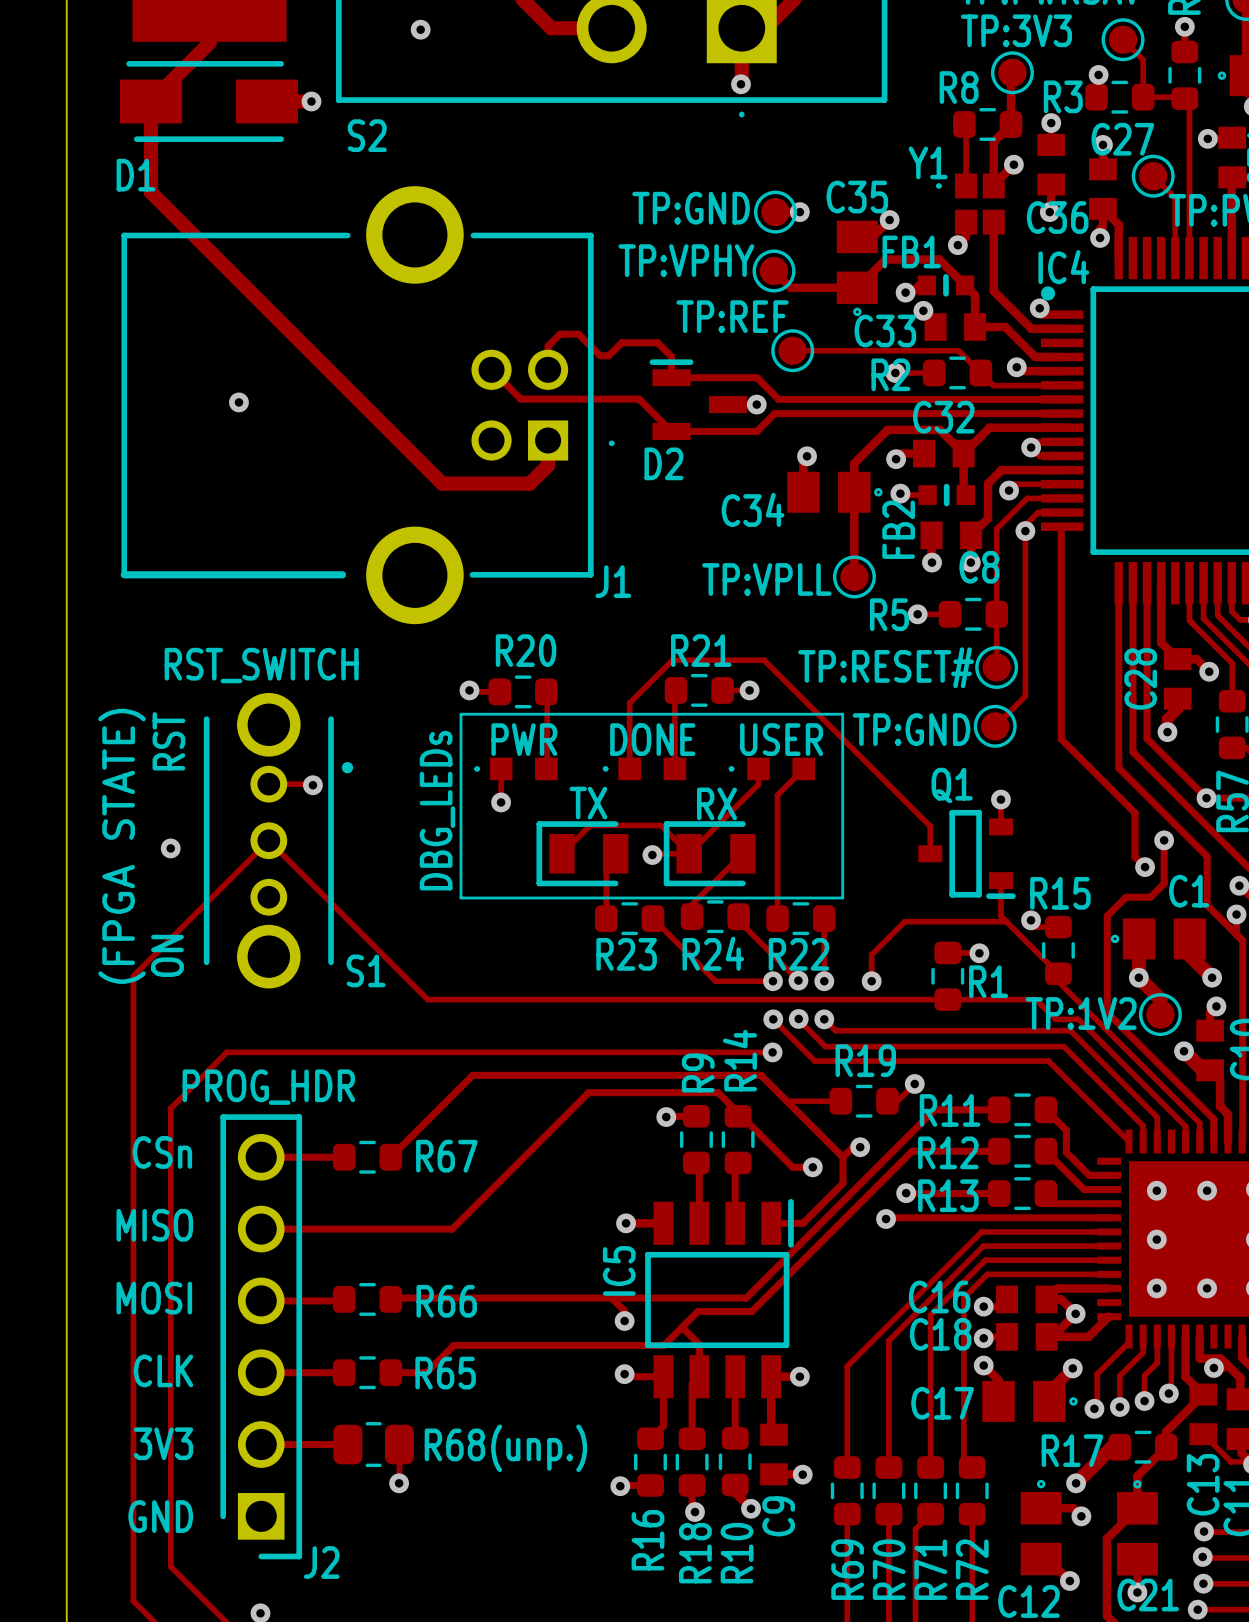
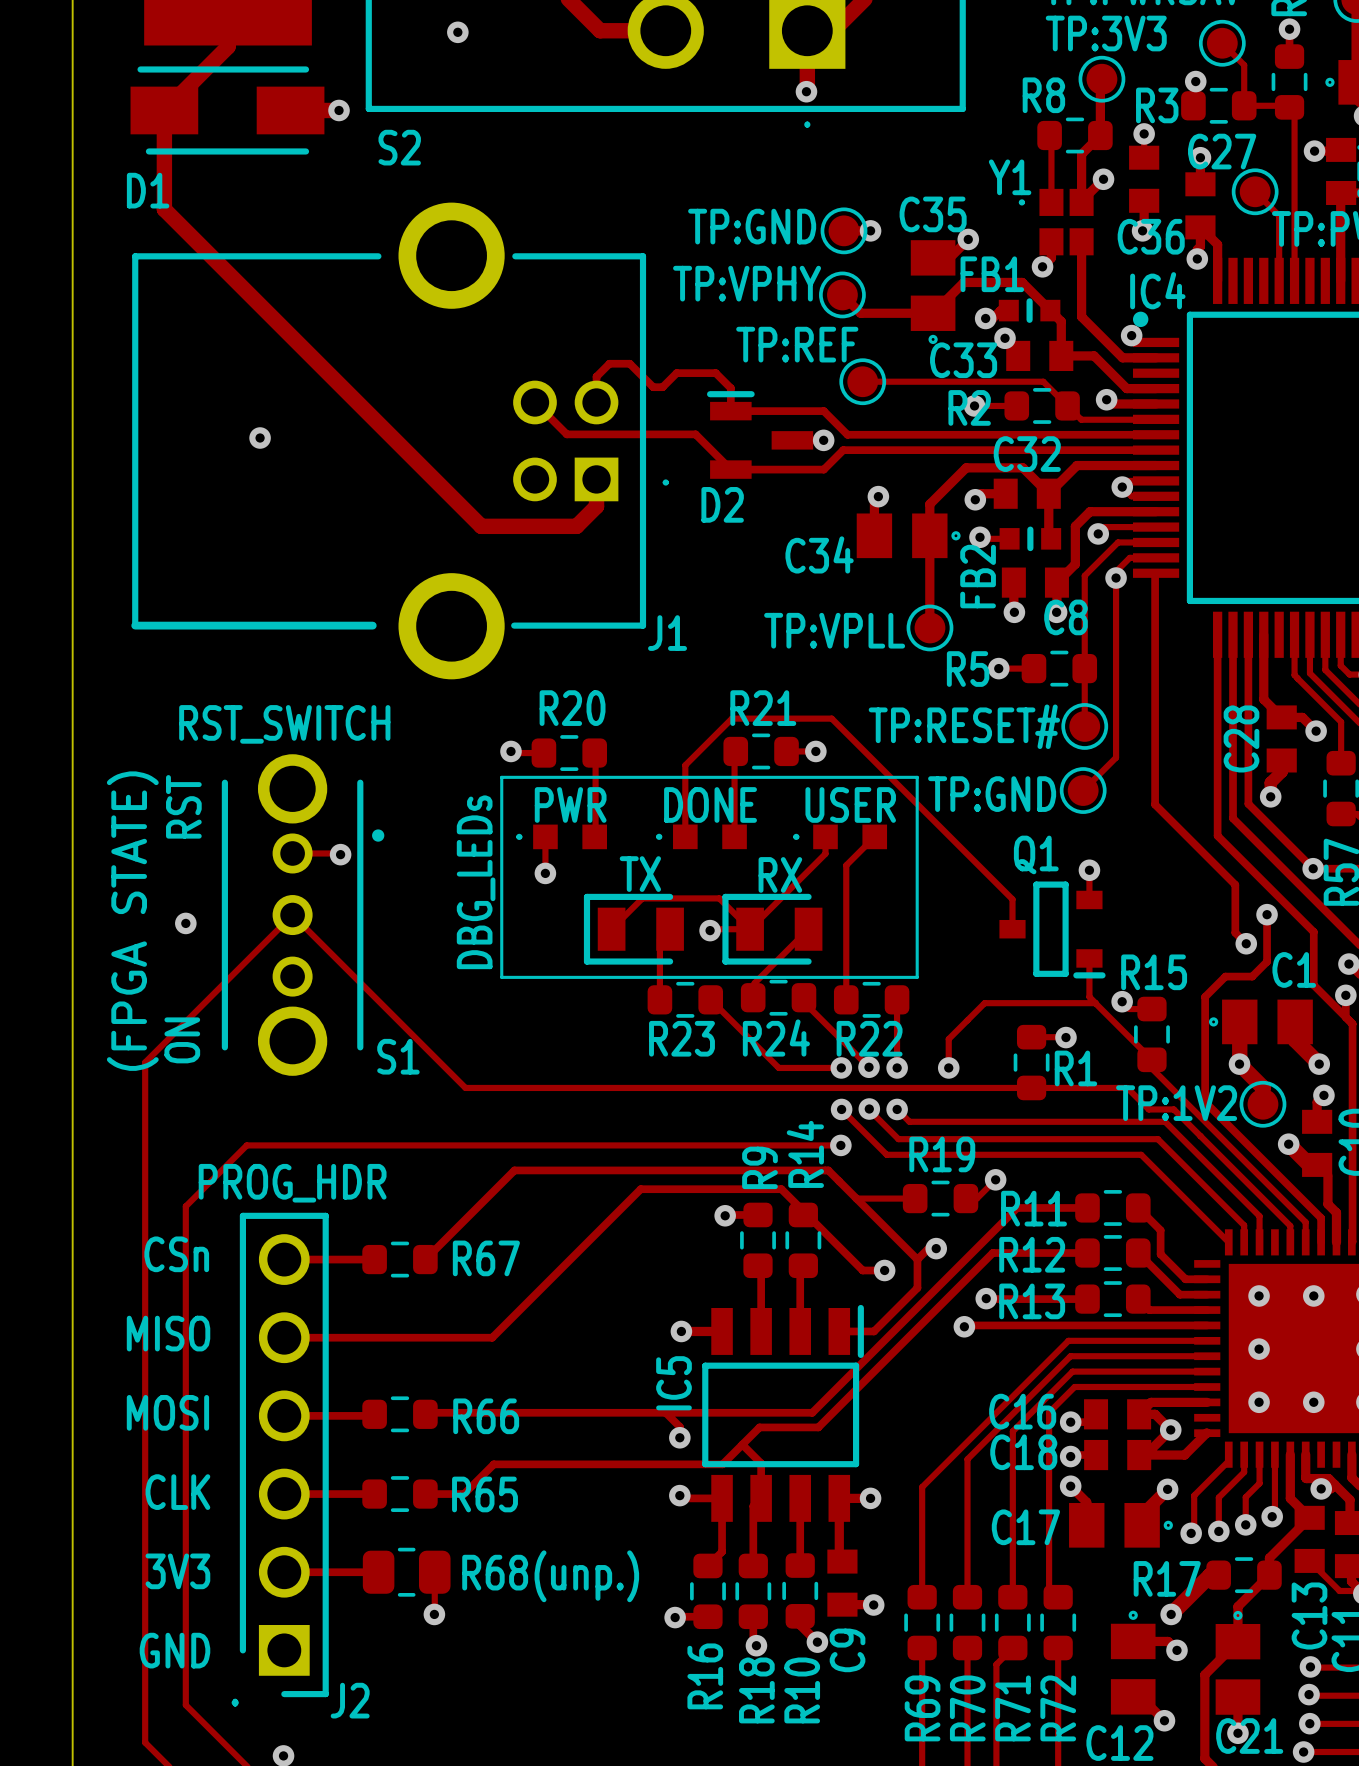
text: none -> . (235, 1702)

